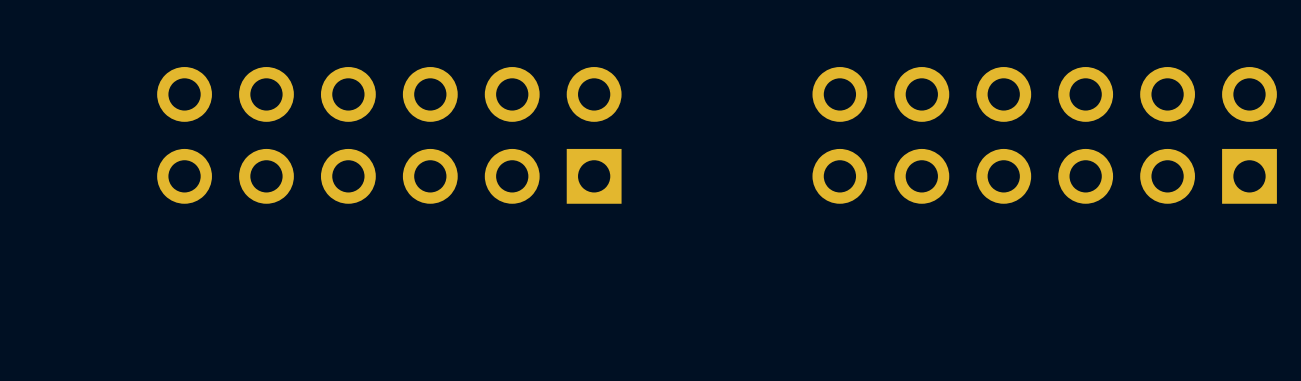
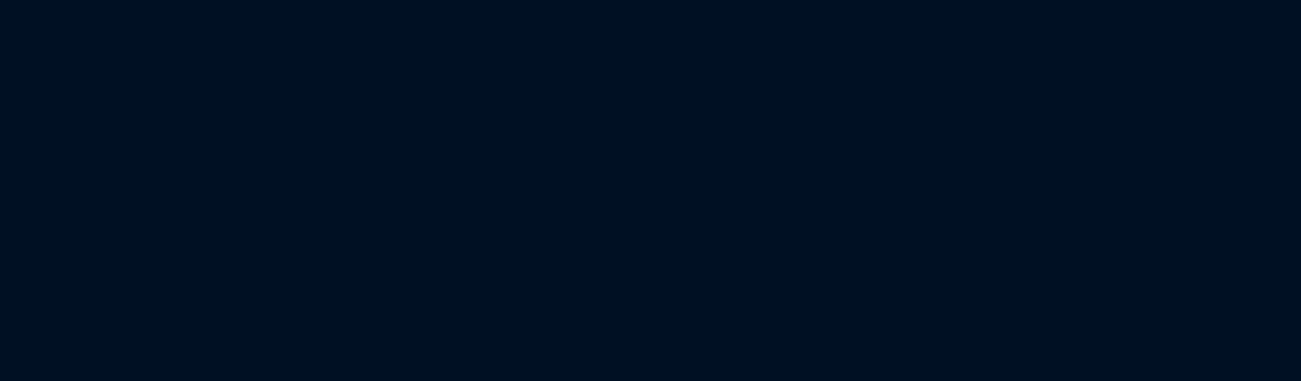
part: (389, 135) -> none
part: (1044, 135) -> none

